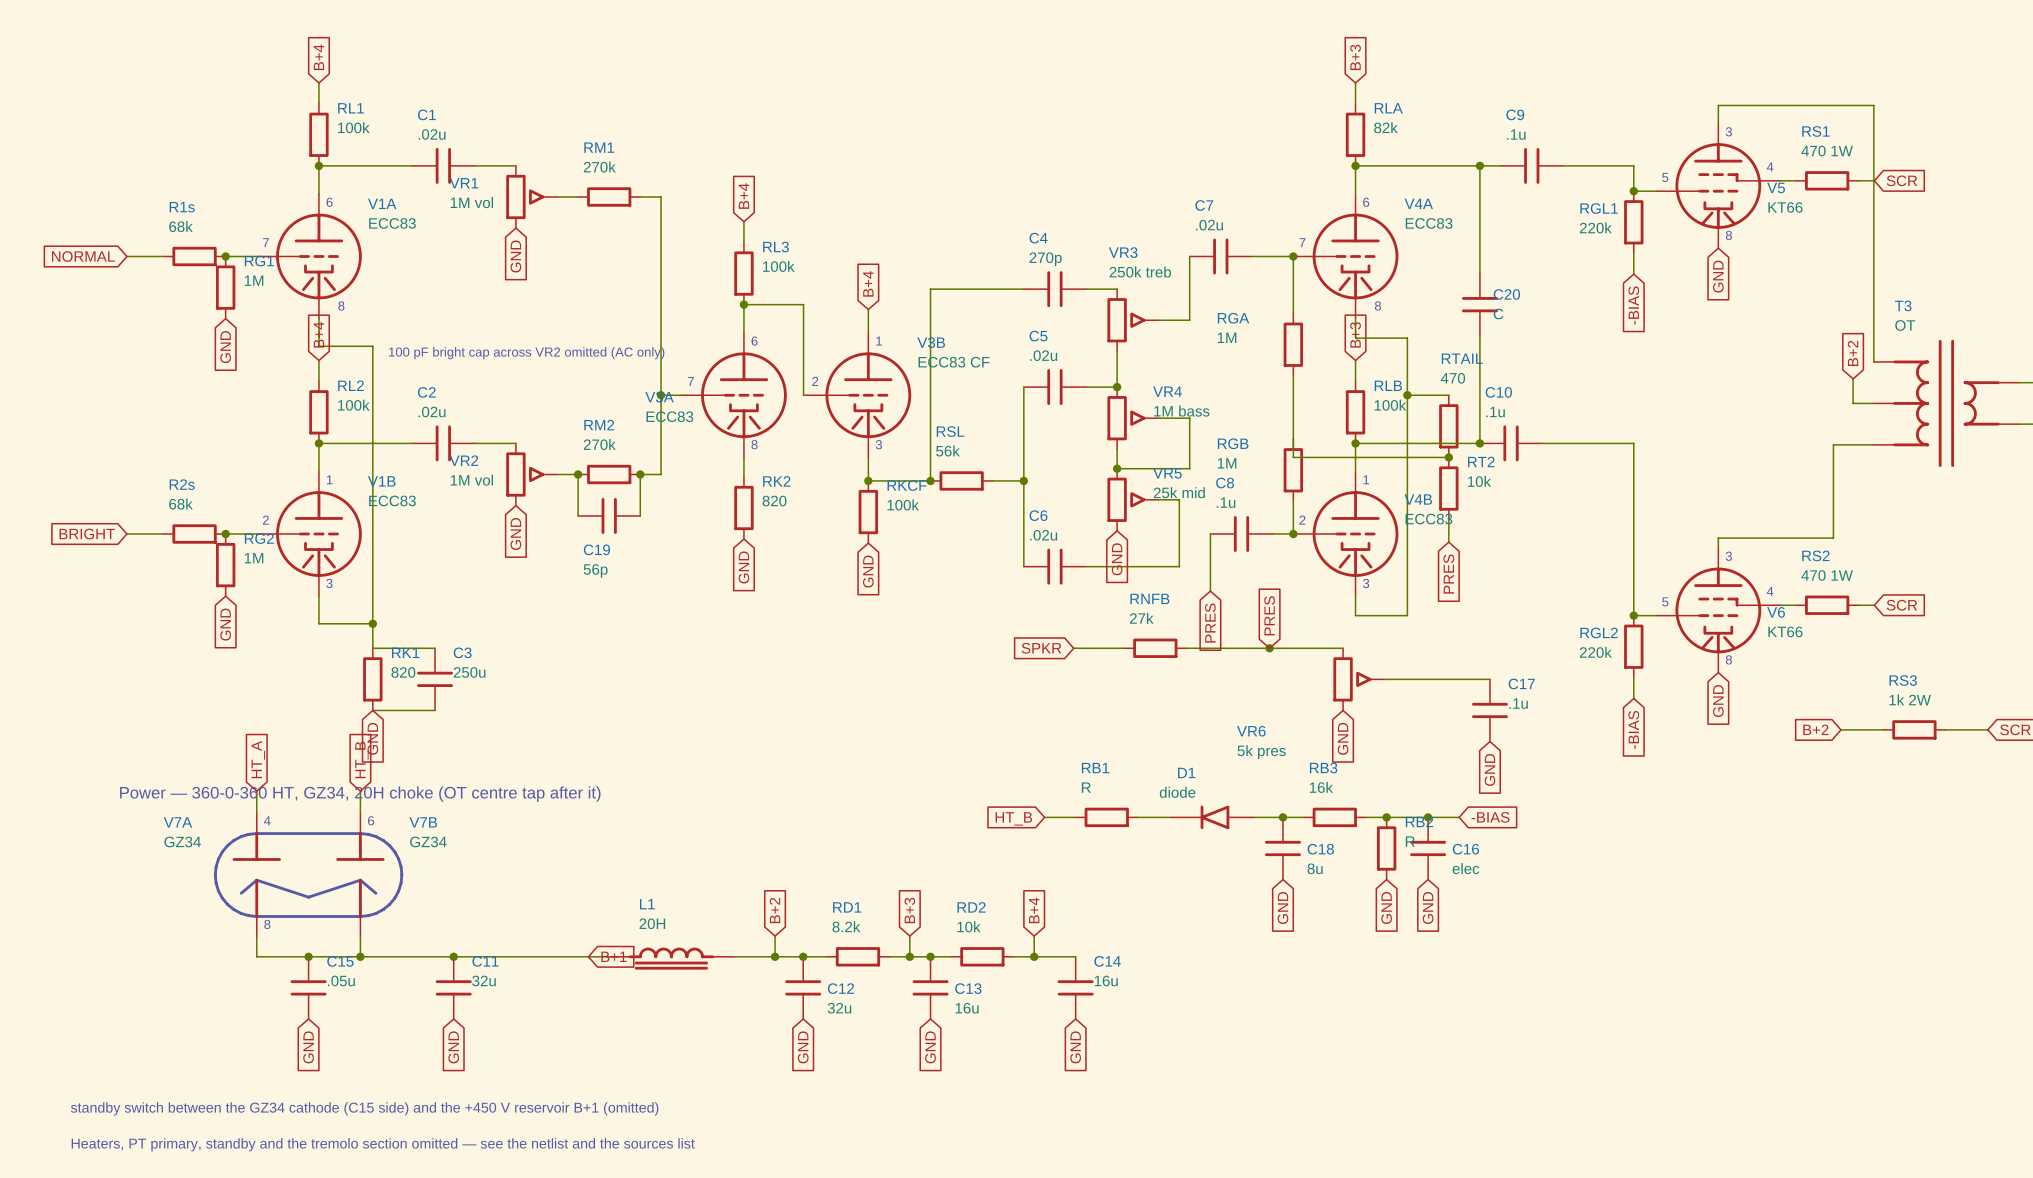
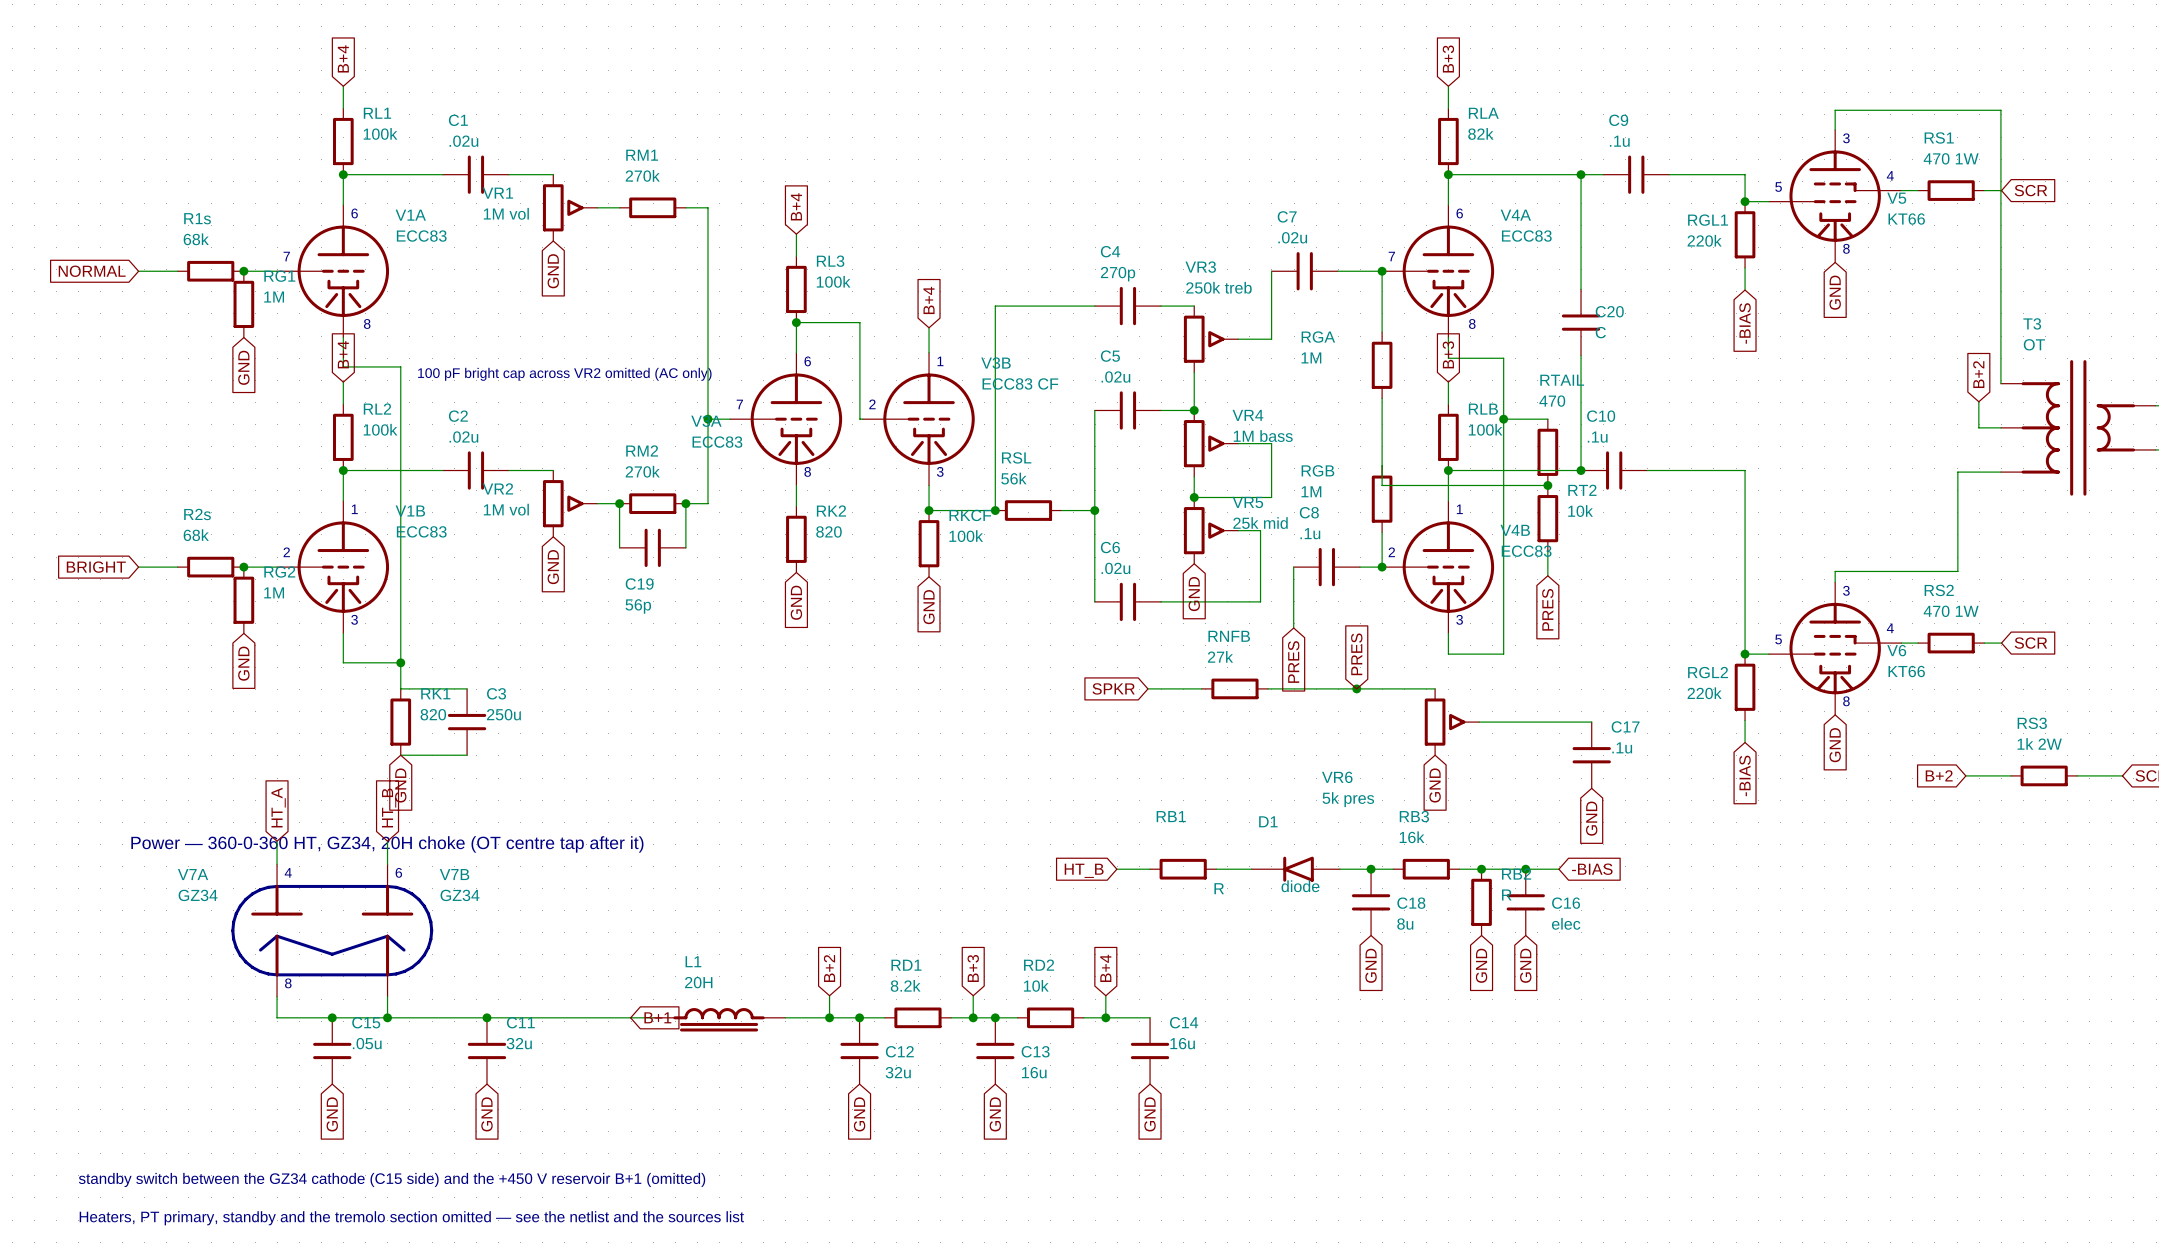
RB1 value position: R (1086, 787) -> R (1219, 888)
D1 value position: diode (1177, 792) -> diode (1300, 886)

